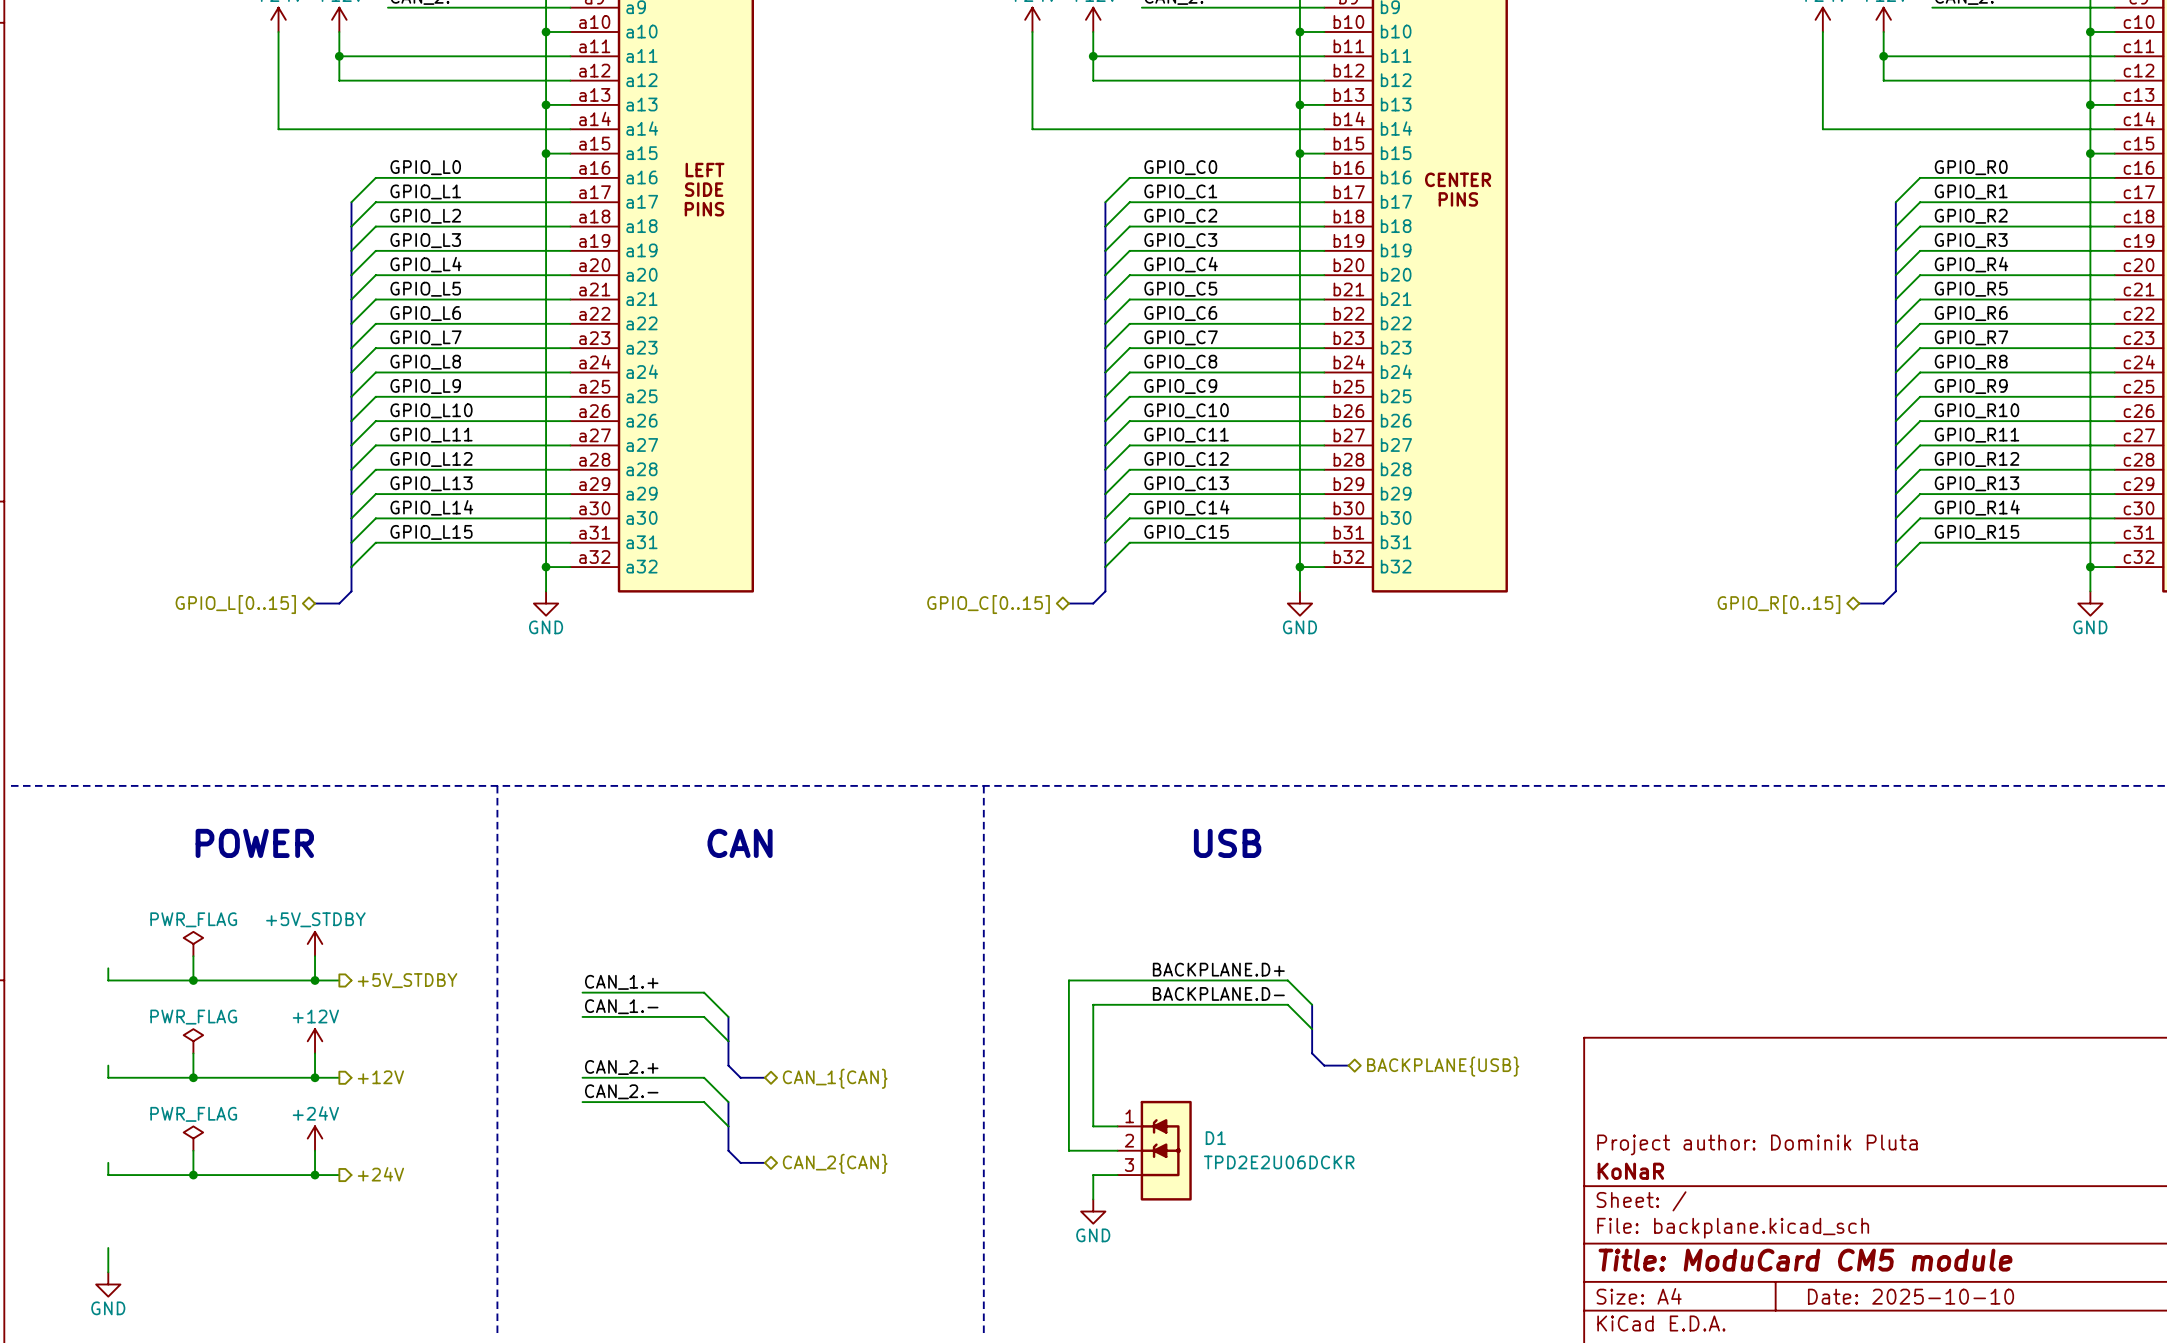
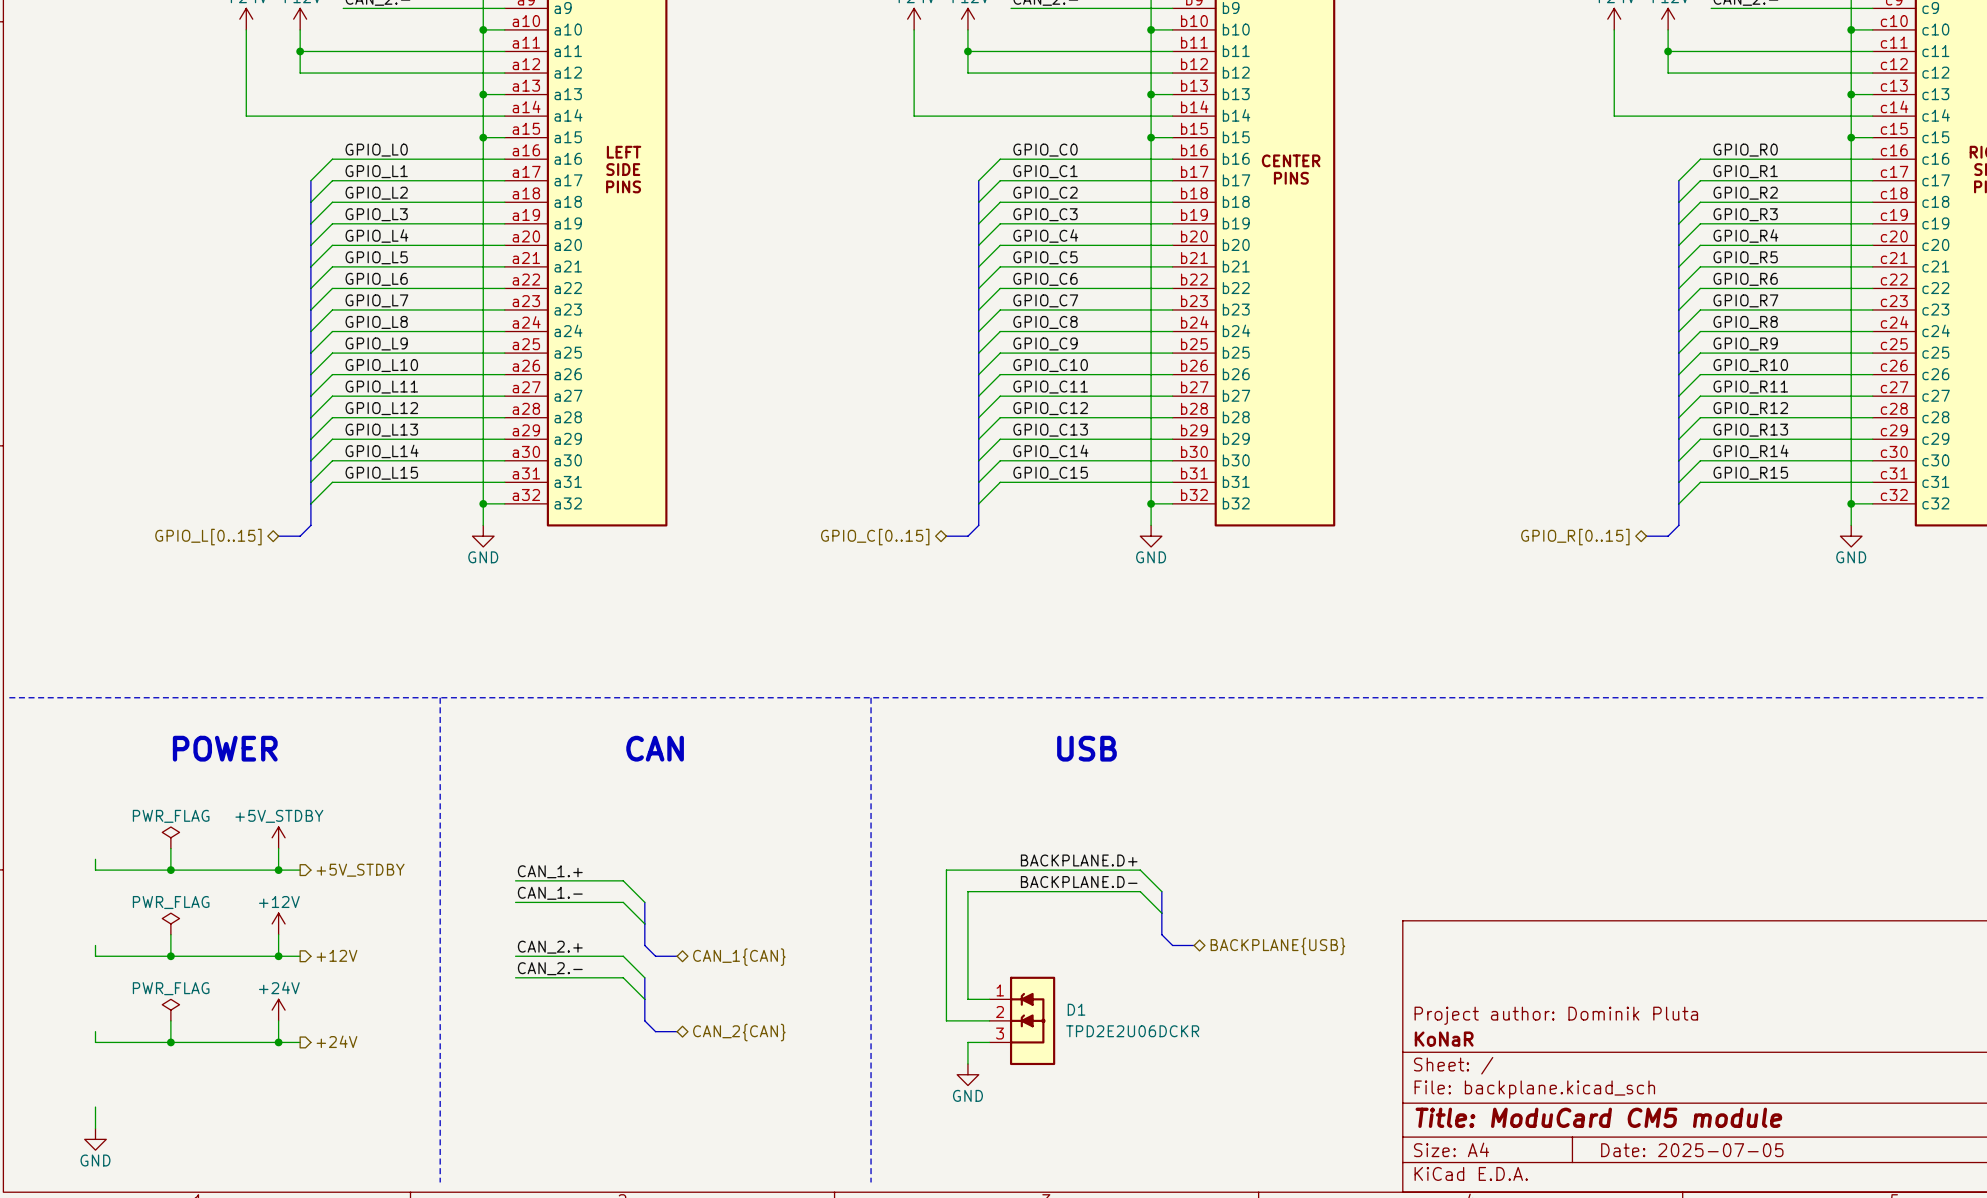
title block: Date: 2025-10-10 (1911, 1296) -> Date: 2025-07-05 (1692, 1150)

